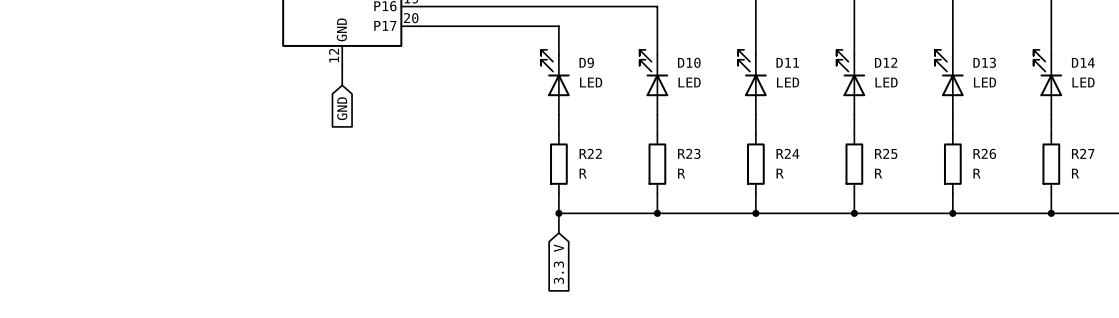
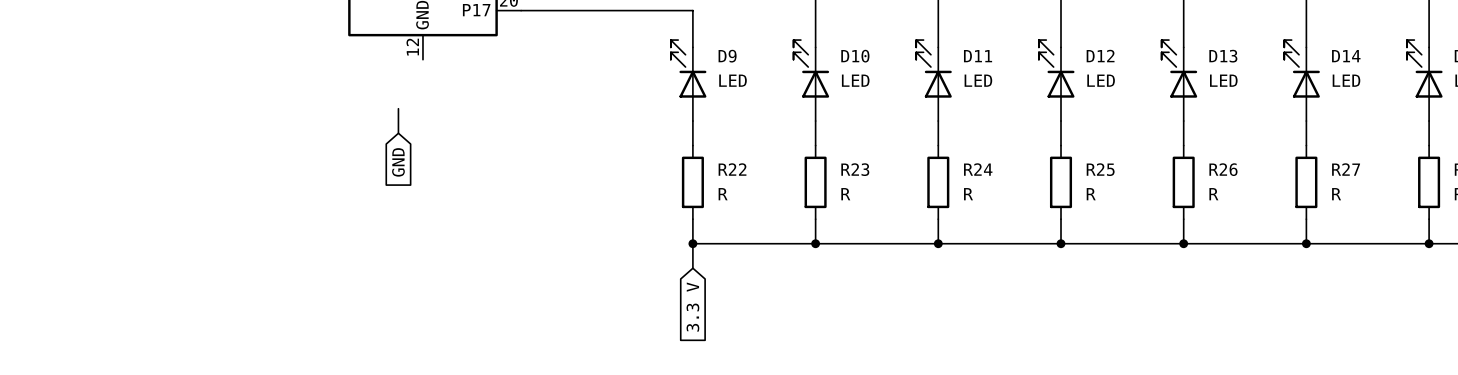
wire: (342, 65) (342, 85) -> (398, 108) (398, 133)
global label position: GND (342, 108) -> GND (398, 162)

